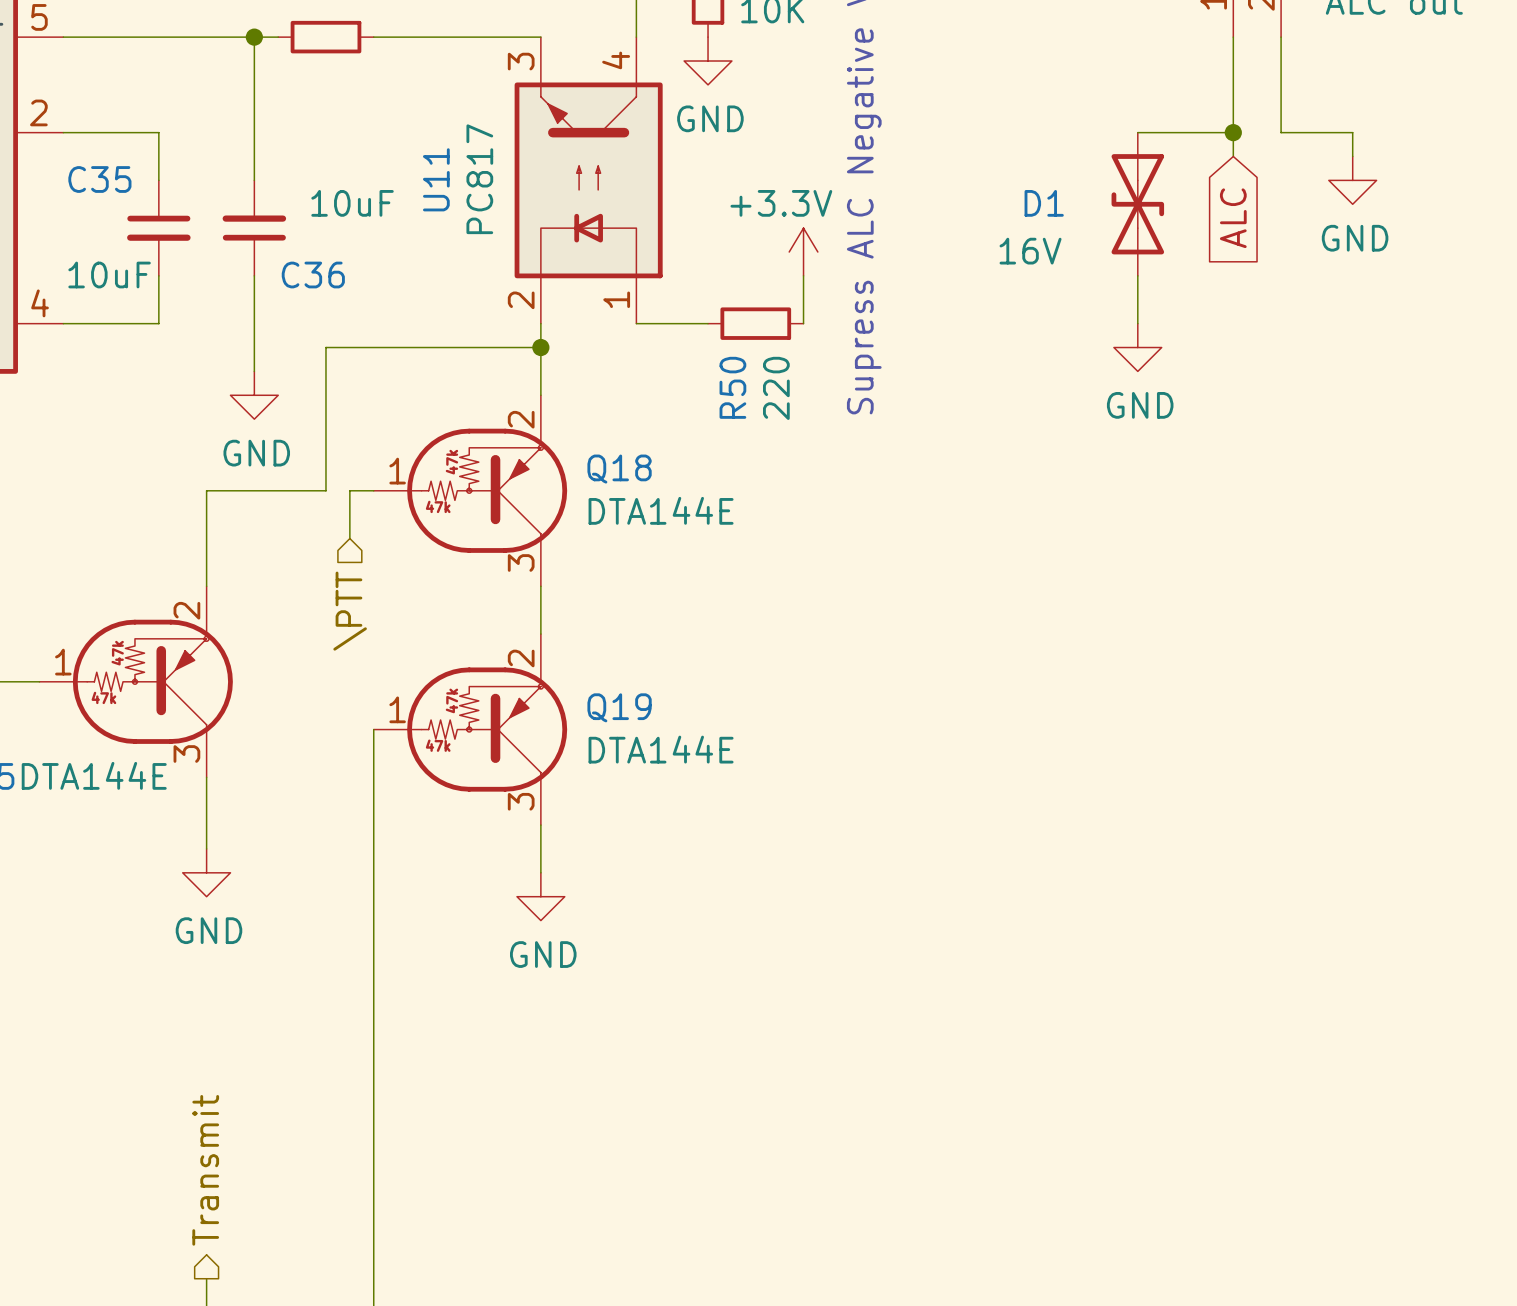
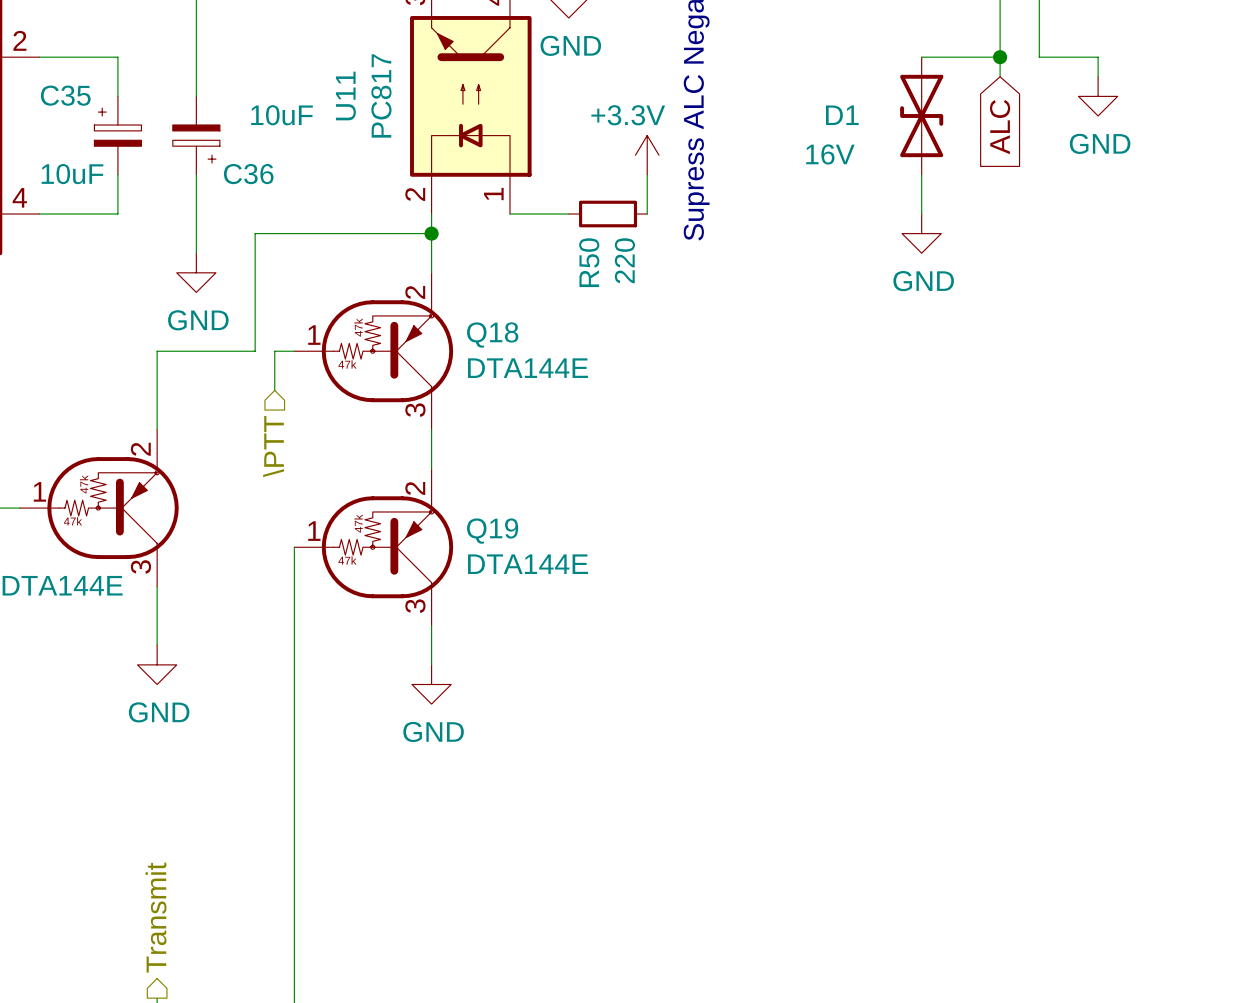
C35 symbol: [127, 180, 191, 276] -> [94, 96, 142, 175]
C36 symbol: [222, 180, 287, 276] -> [172, 96, 220, 175]

